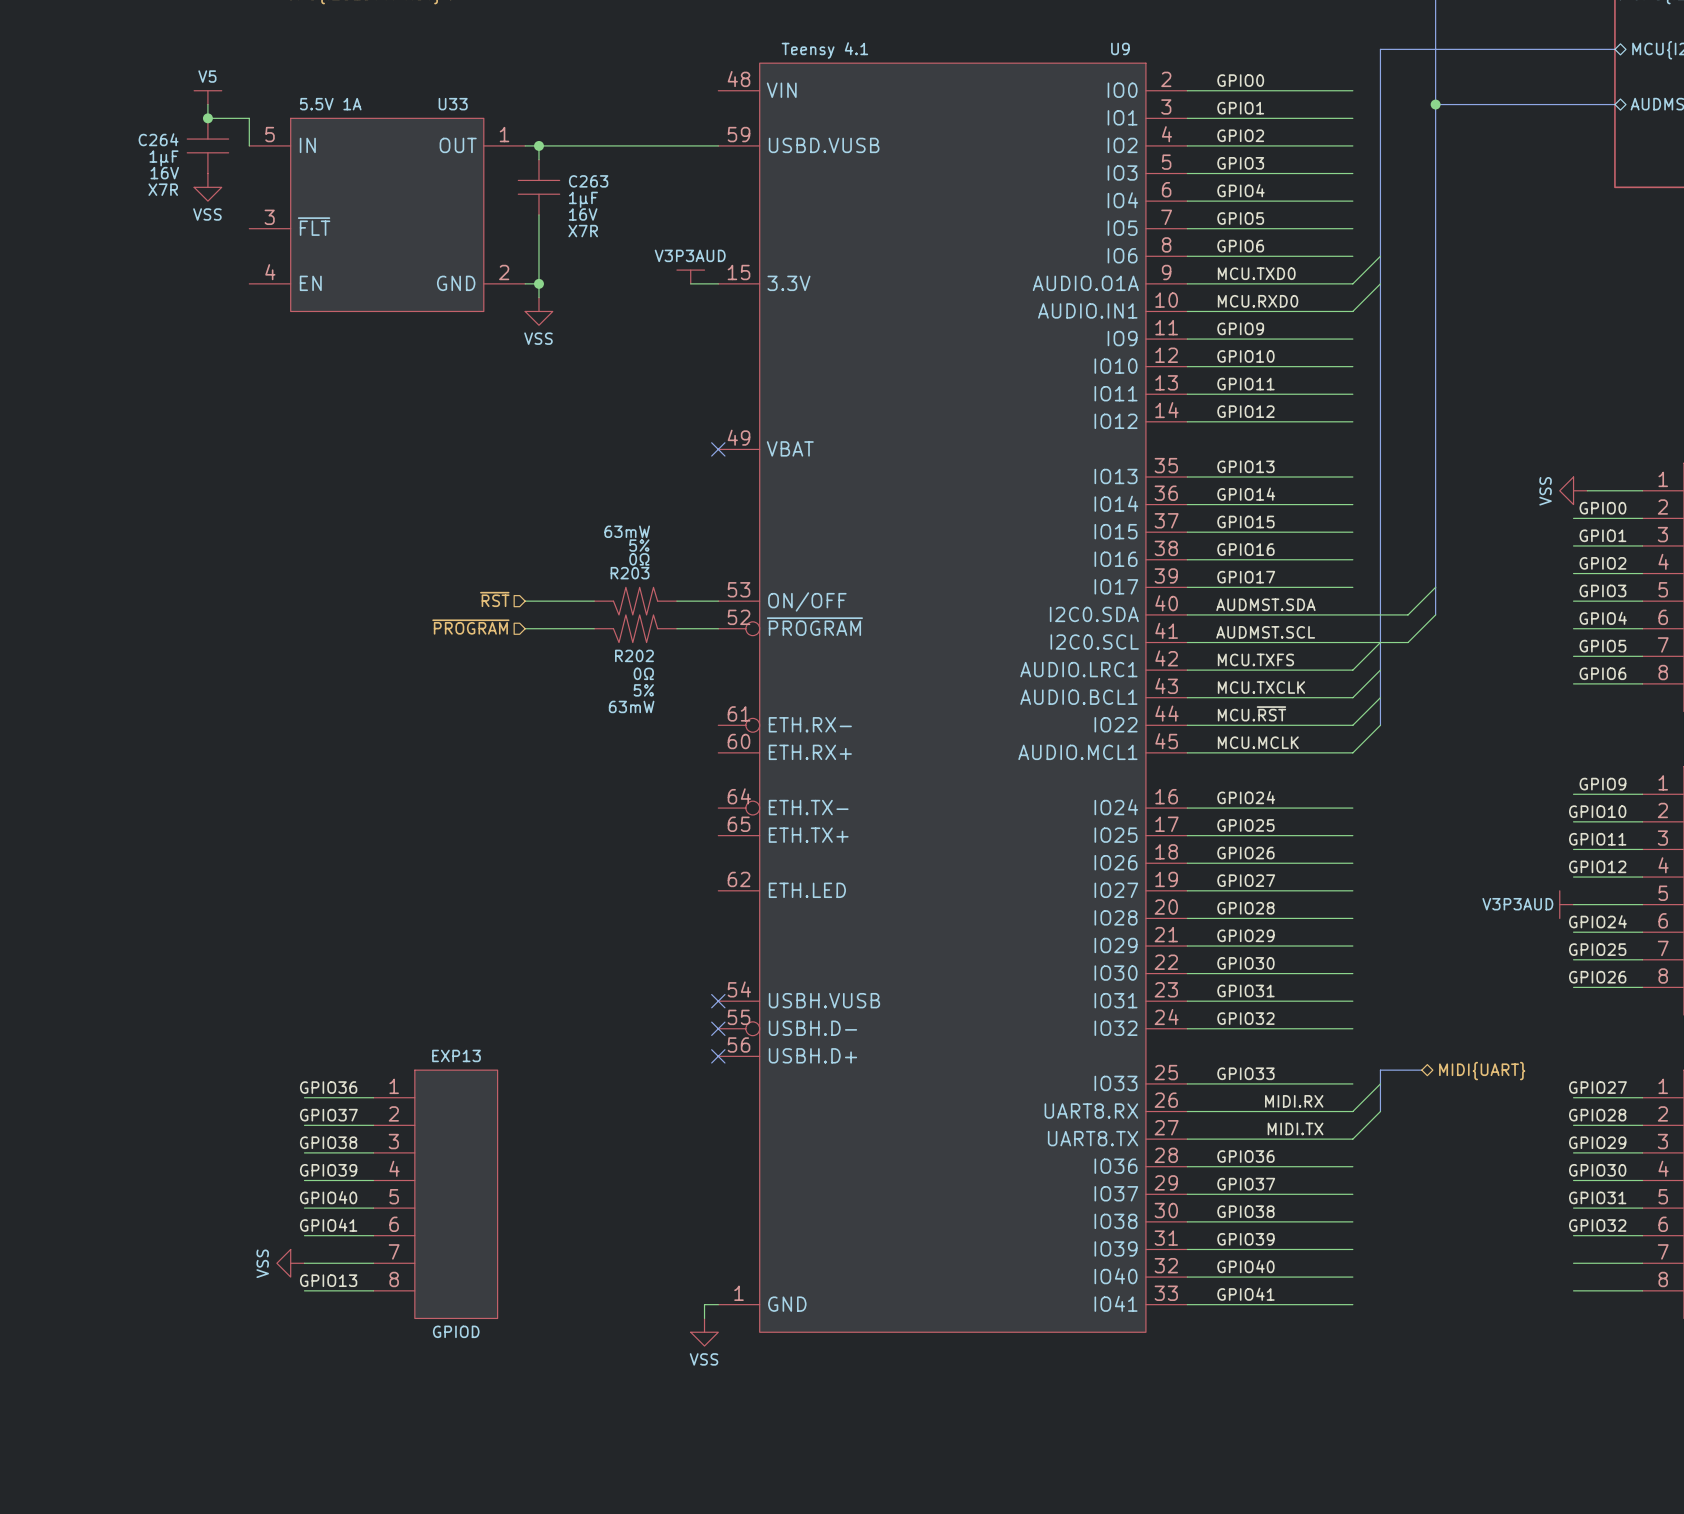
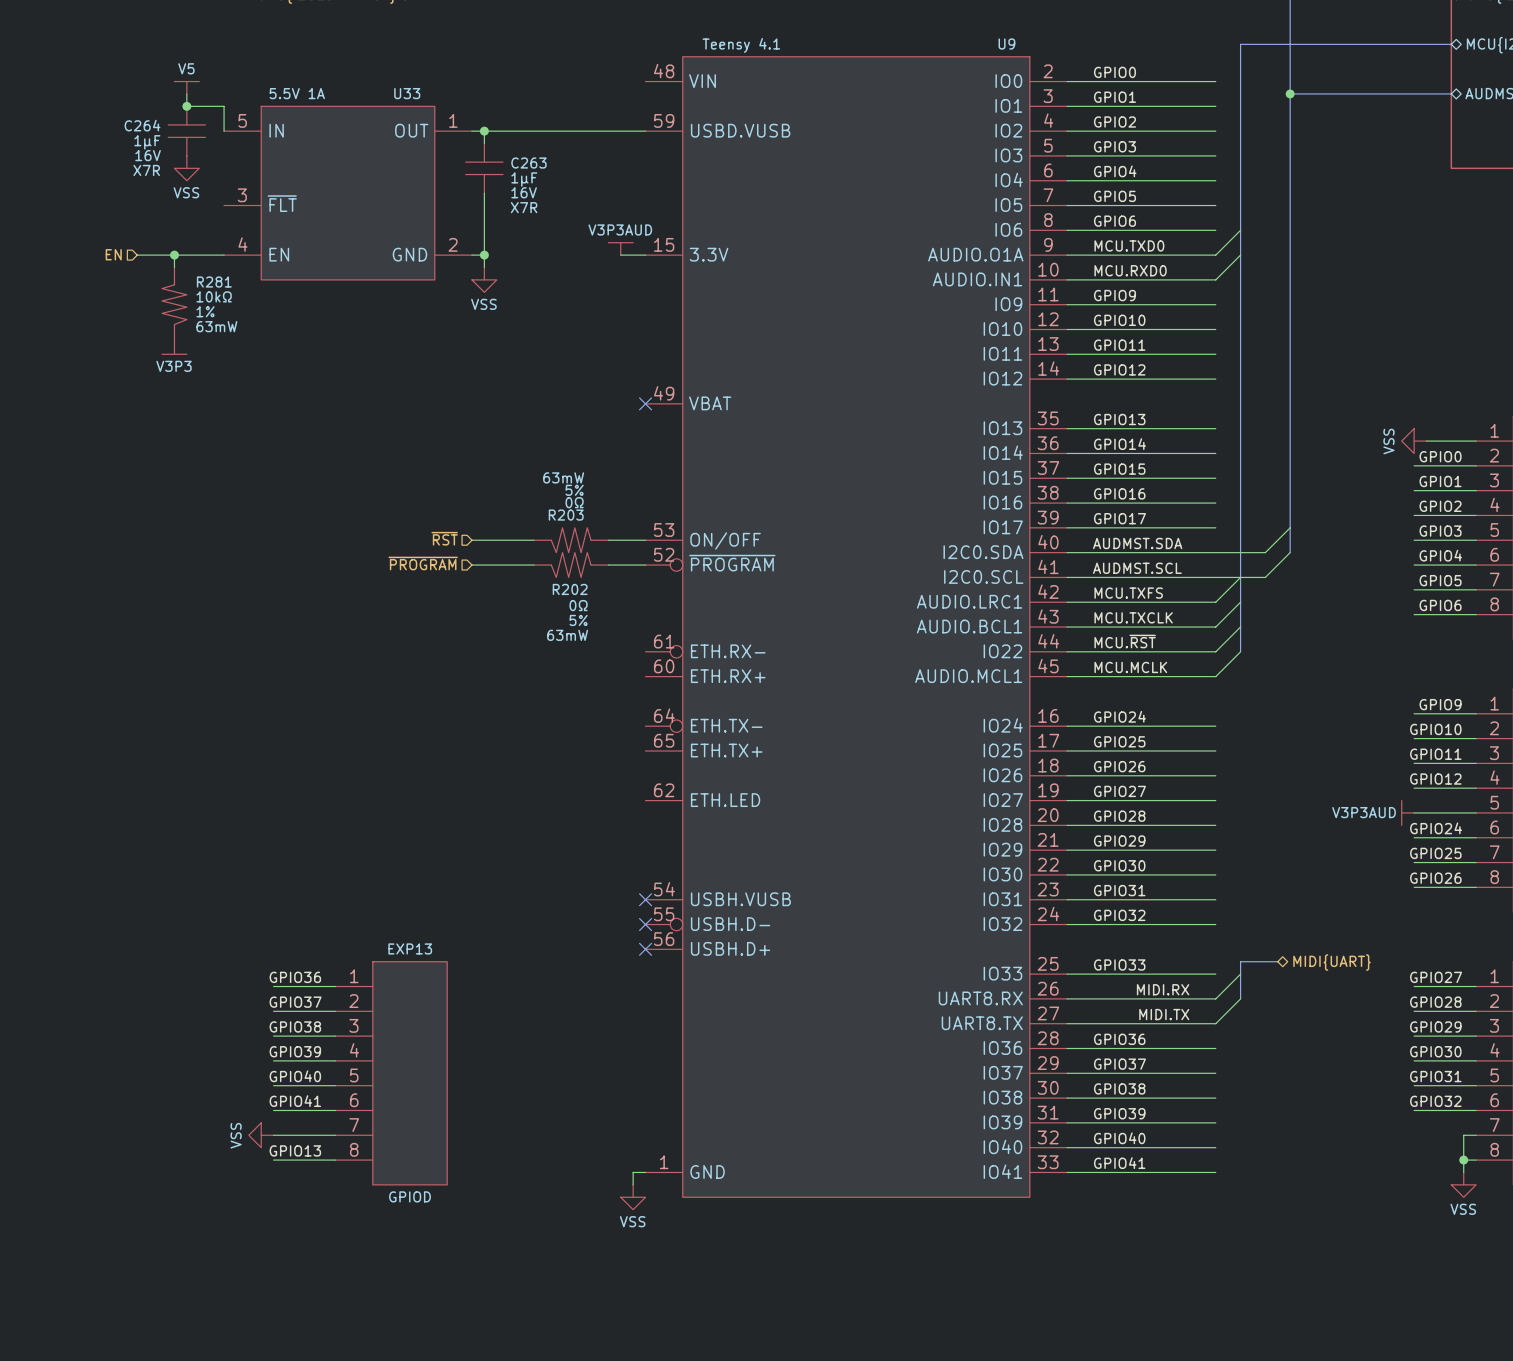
hierarchical label: none -> EN (113, 254)
wire: none -> (137, 255) (224, 255)
wire: none -> (174, 255) (174, 267)
junction: none -> (174, 255)
R281: none -> (174, 304)
power symbol: none -> V3P3 (174, 348)
wire: (1573, 1263) (1628, 1263) -> (1463, 1172) (1463, 1135)
wire: (1573, 1290) (1628, 1290) -> none
junction: none -> (1463, 1160)
power symbol: none -> VSS (1463, 1184)

